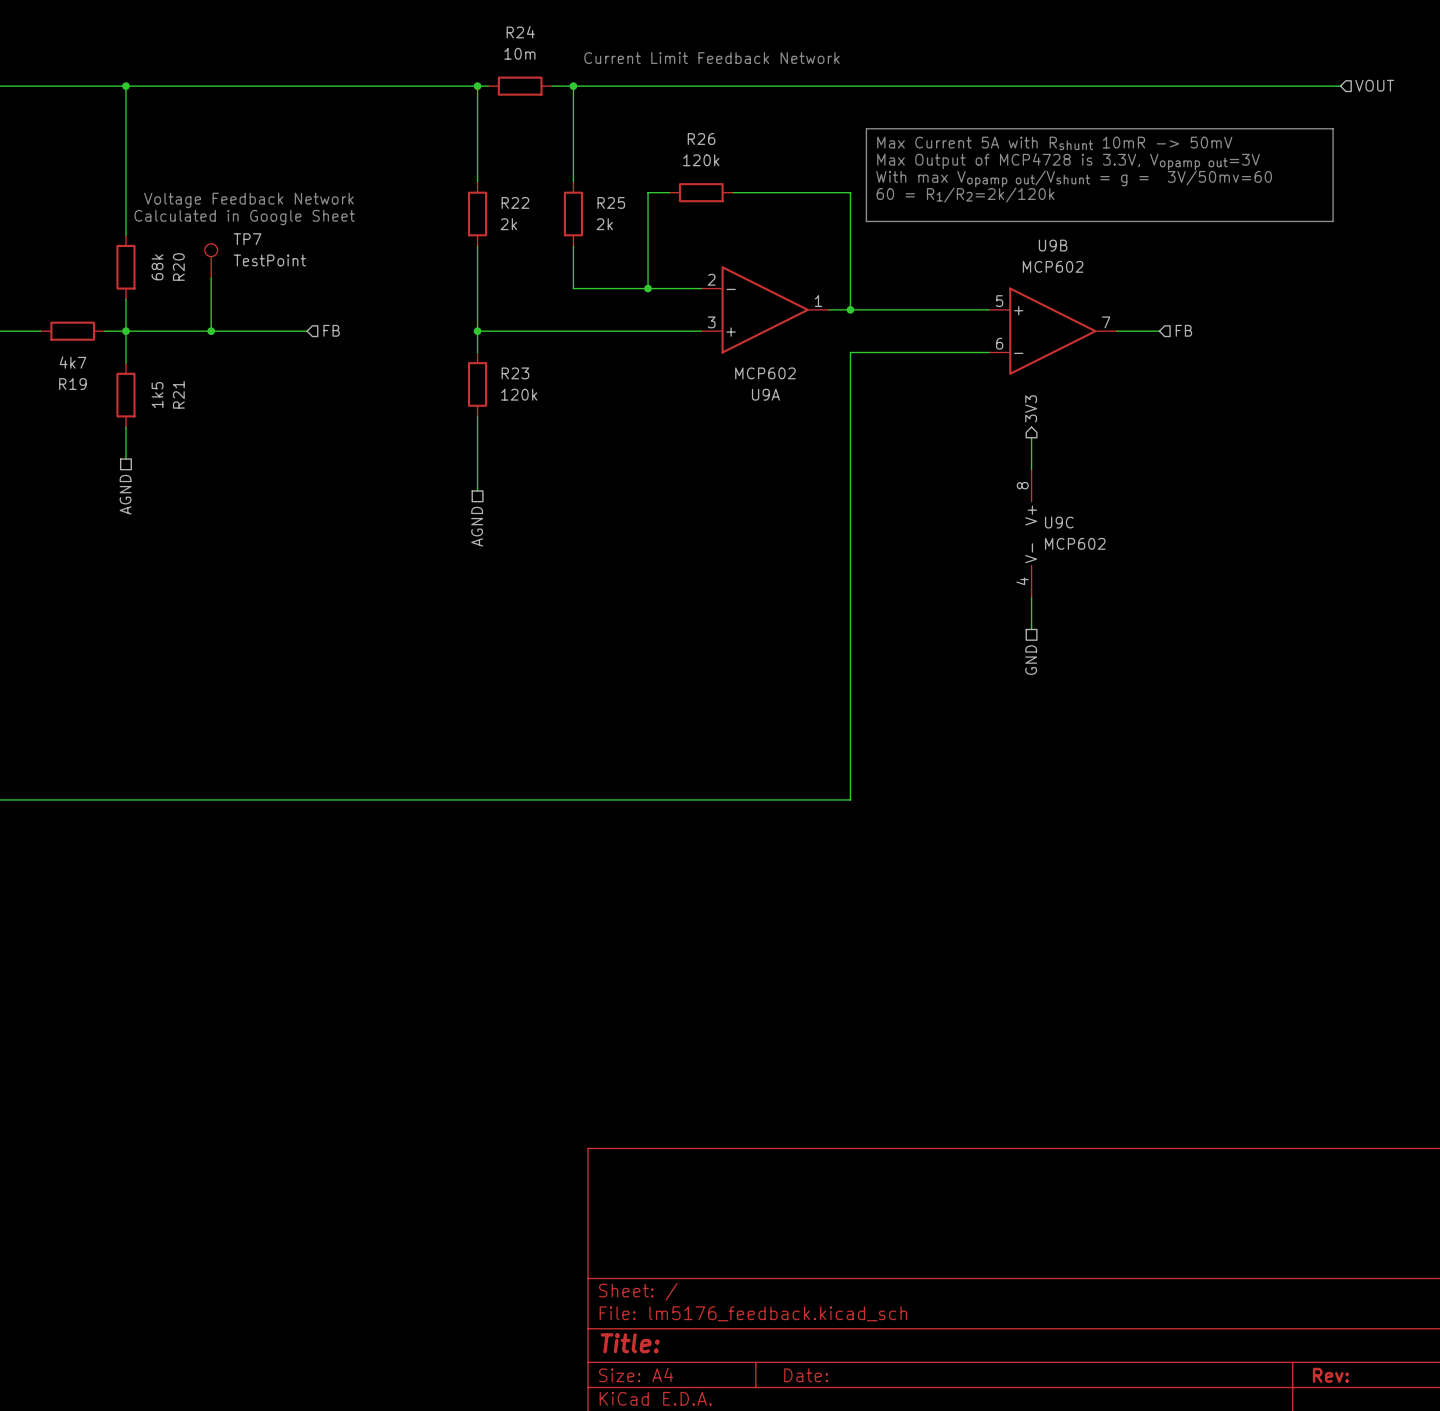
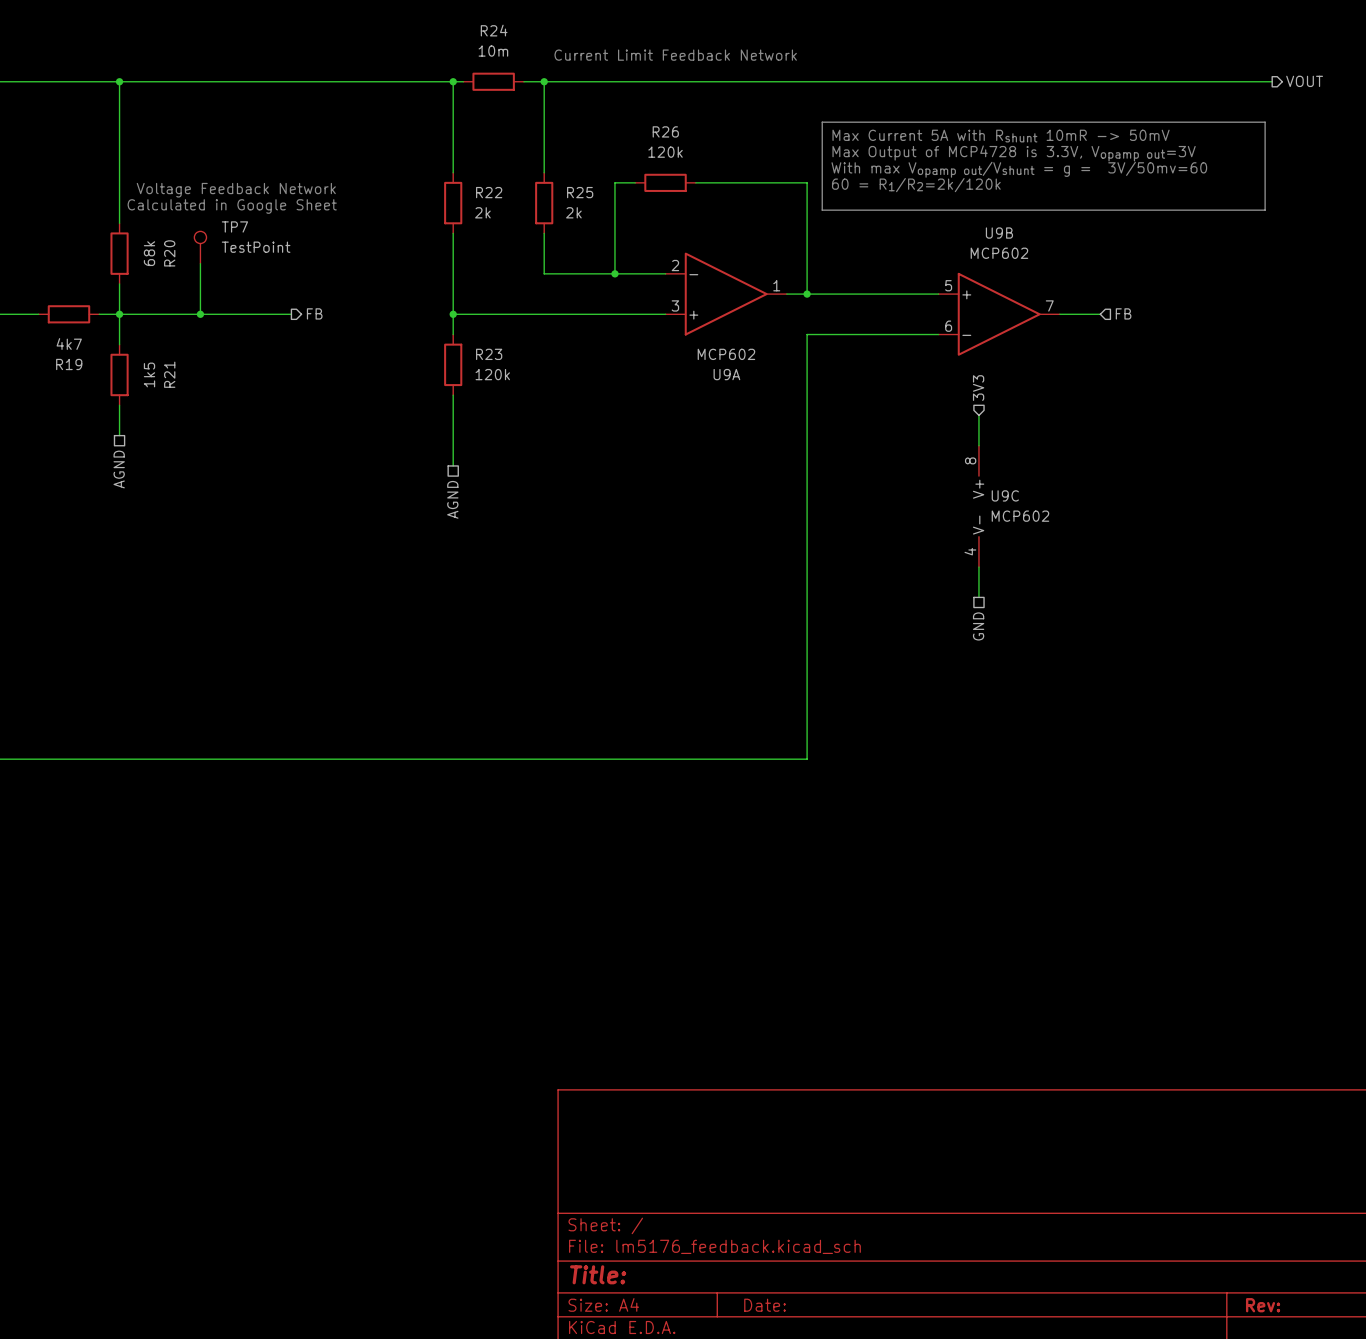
hierarchical label shape: input (1374, 85) -> output (1304, 81)
hierarchical label shape: input (331, 330) -> output (314, 313)
hierarchical label shape: output (1031, 408) -> input (978, 388)

